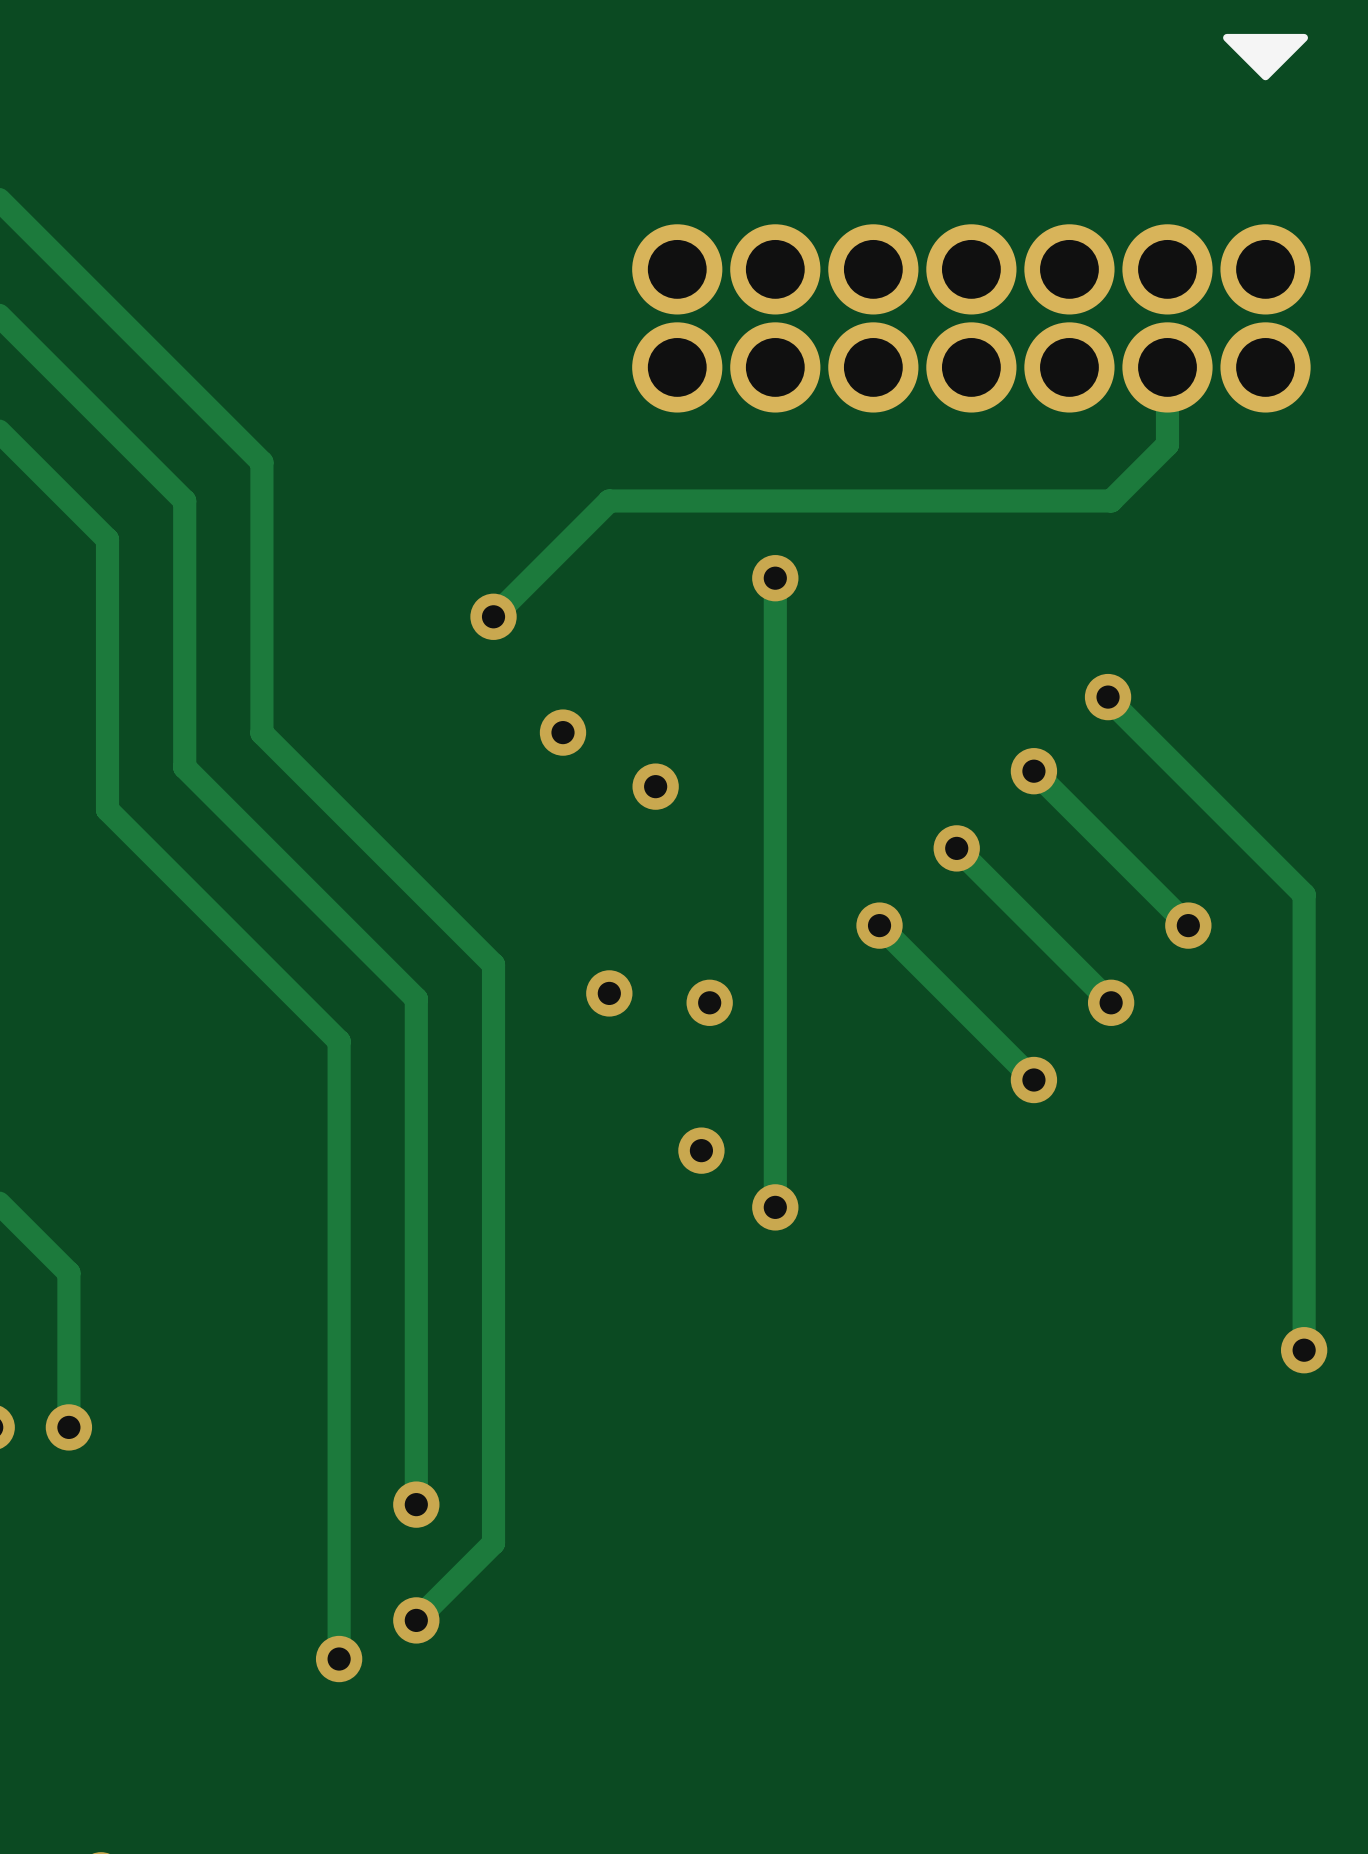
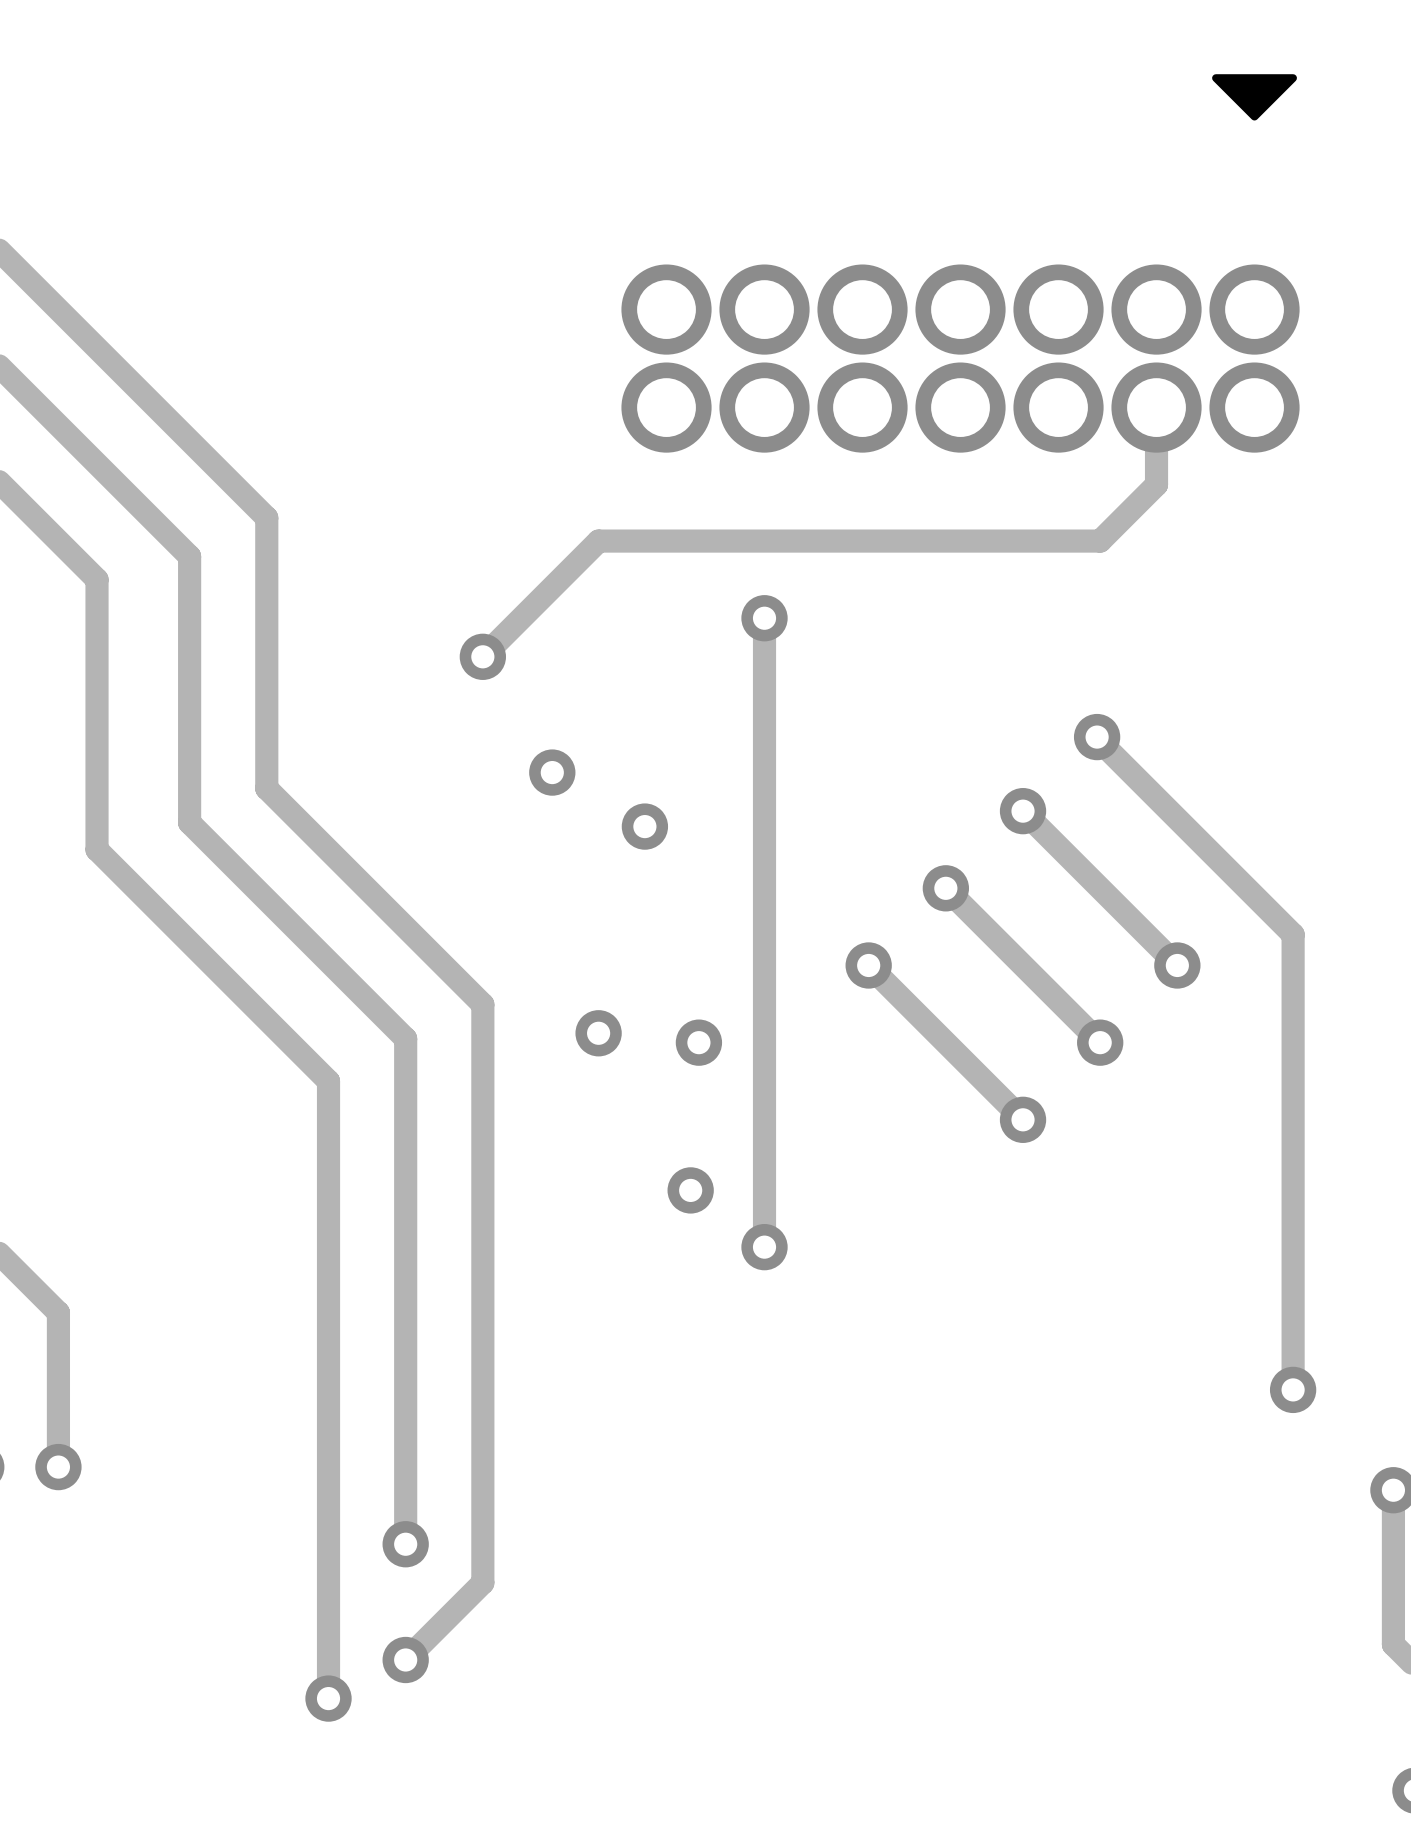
track: (261, 462) (261, 733) (277, 748) -> (251, 502) (266, 517) (266, 788)
track: (184, 500) (184, 767) (200, 782) -> (174, 541) (189, 556) (189, 822)

